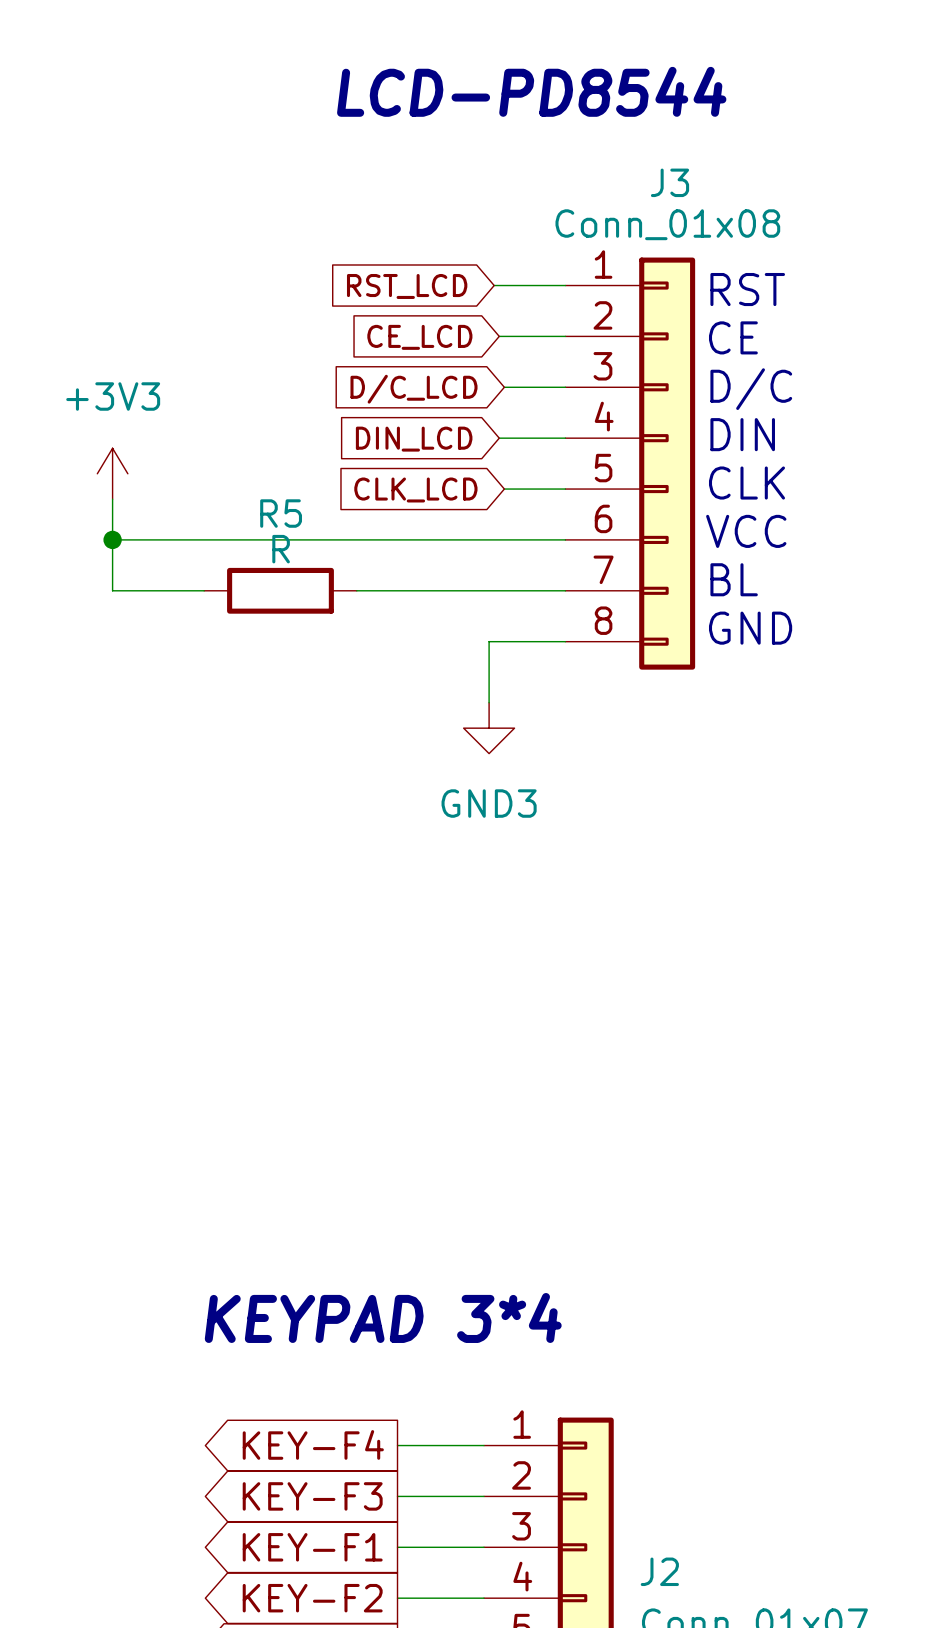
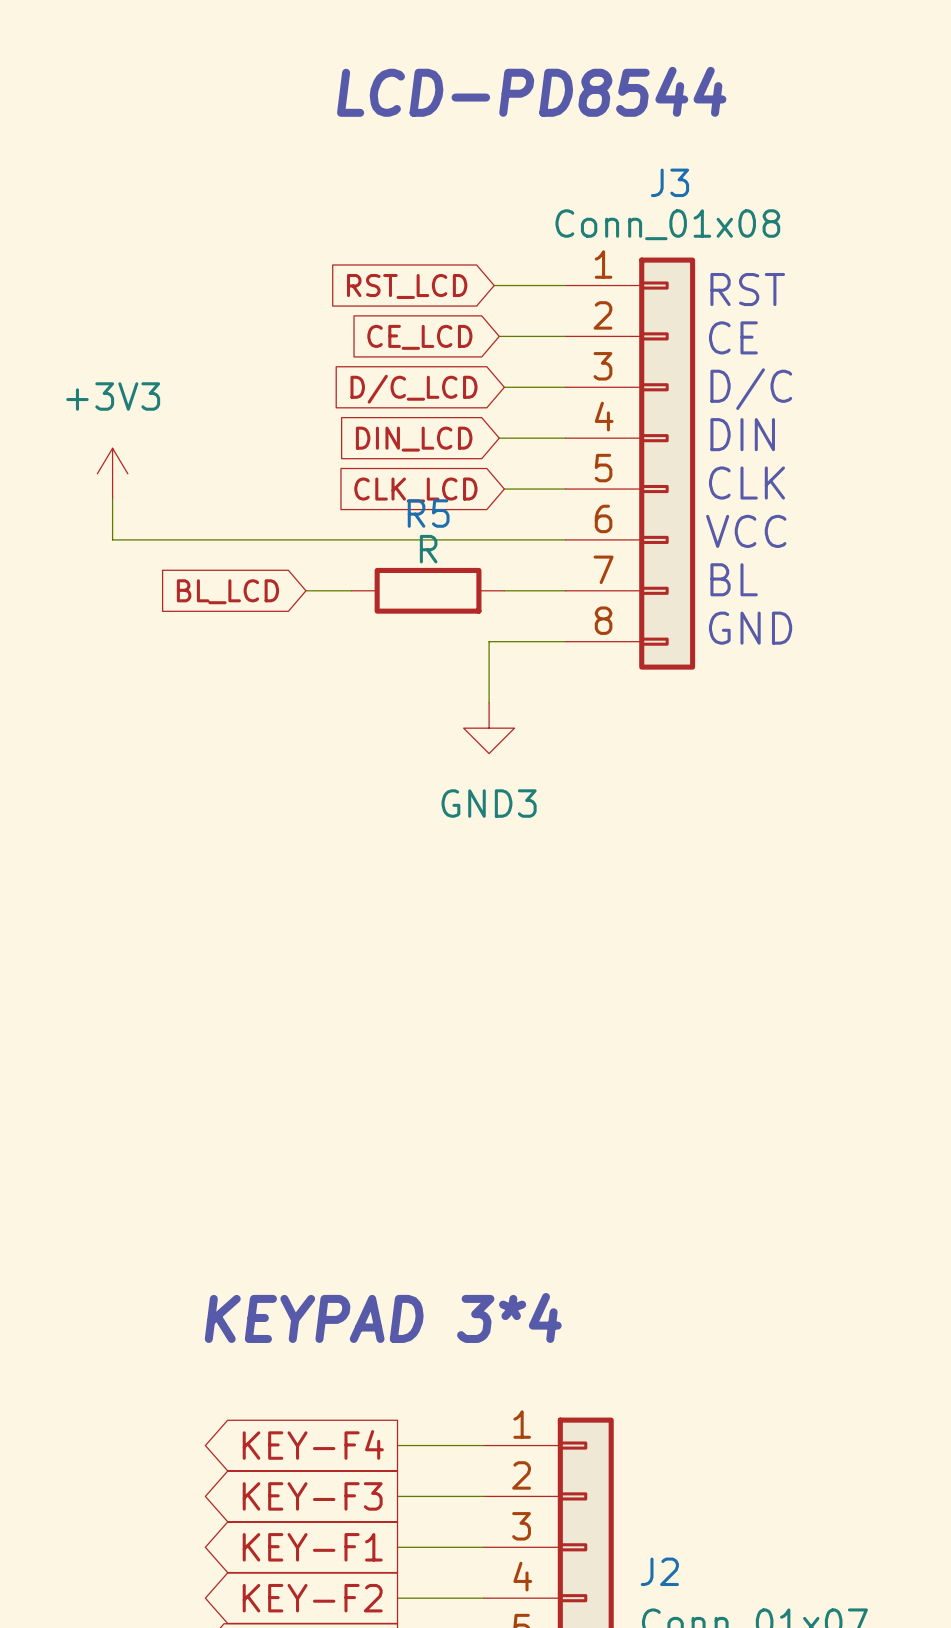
wire: (112, 539) (112, 590) (204, 590) -> none
junction: (112, 539) -> none
R5 position: (280, 590) -> (428, 590)
wire: none -> (305, 590) (351, 590)
wire: (356, 590) (504, 590) -> none
global label: none -> BL_LCD (227, 591)

